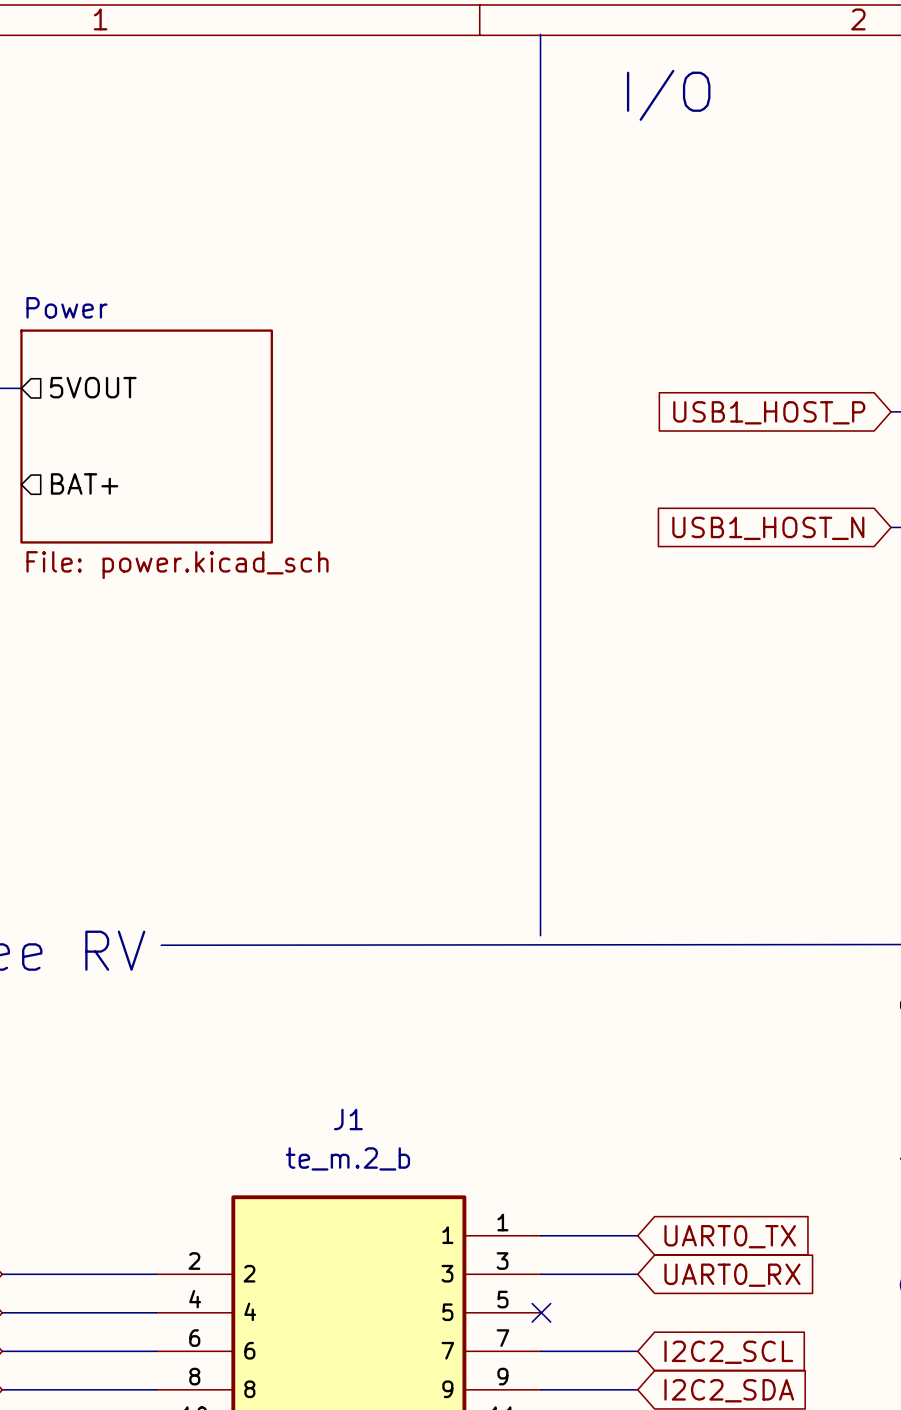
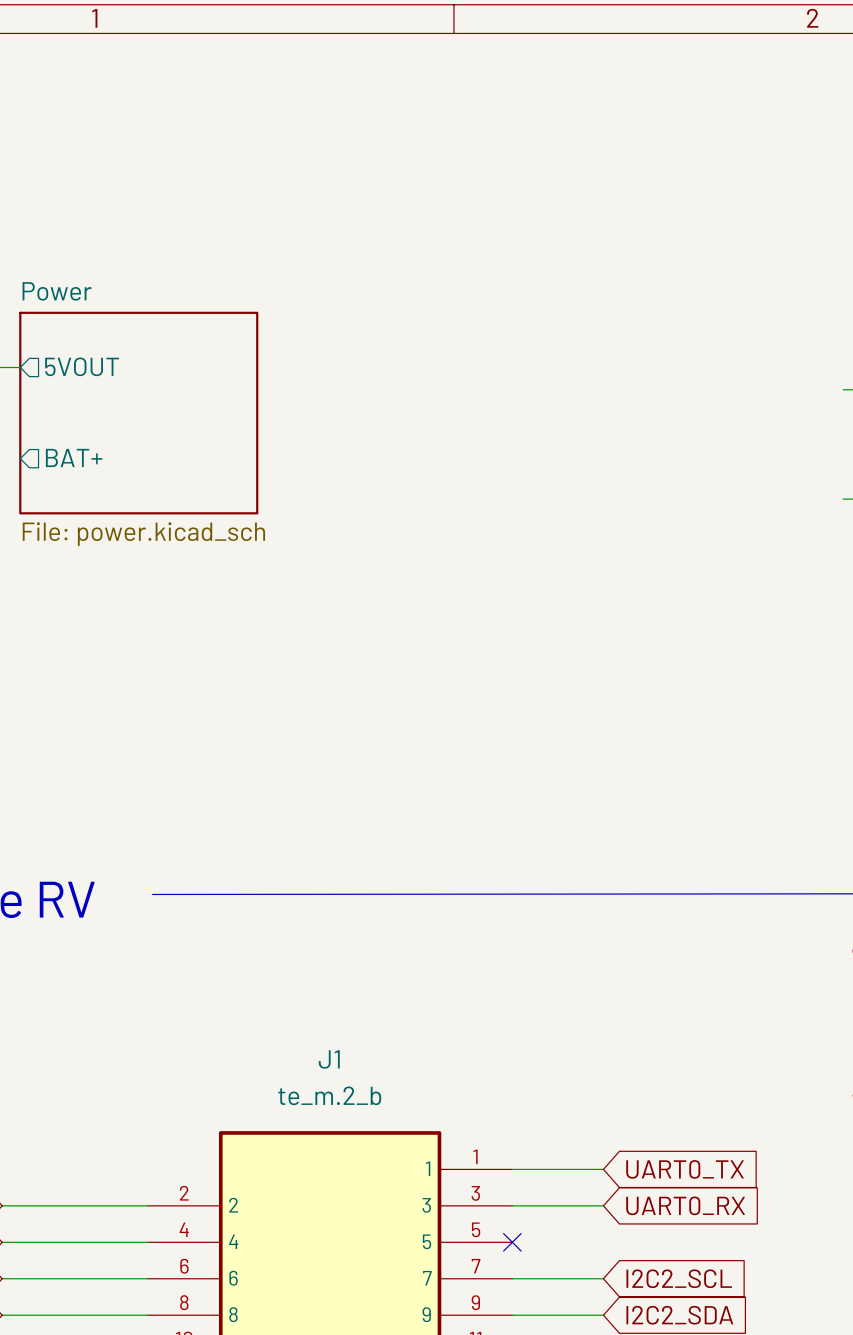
line: (540, 34) (540, 935) -> none
text: I/O (668, 95) -> none
global label: USB1_HOST_P (769, 412) -> none
global label: USB1_HOST_N (768, 528) -> none

